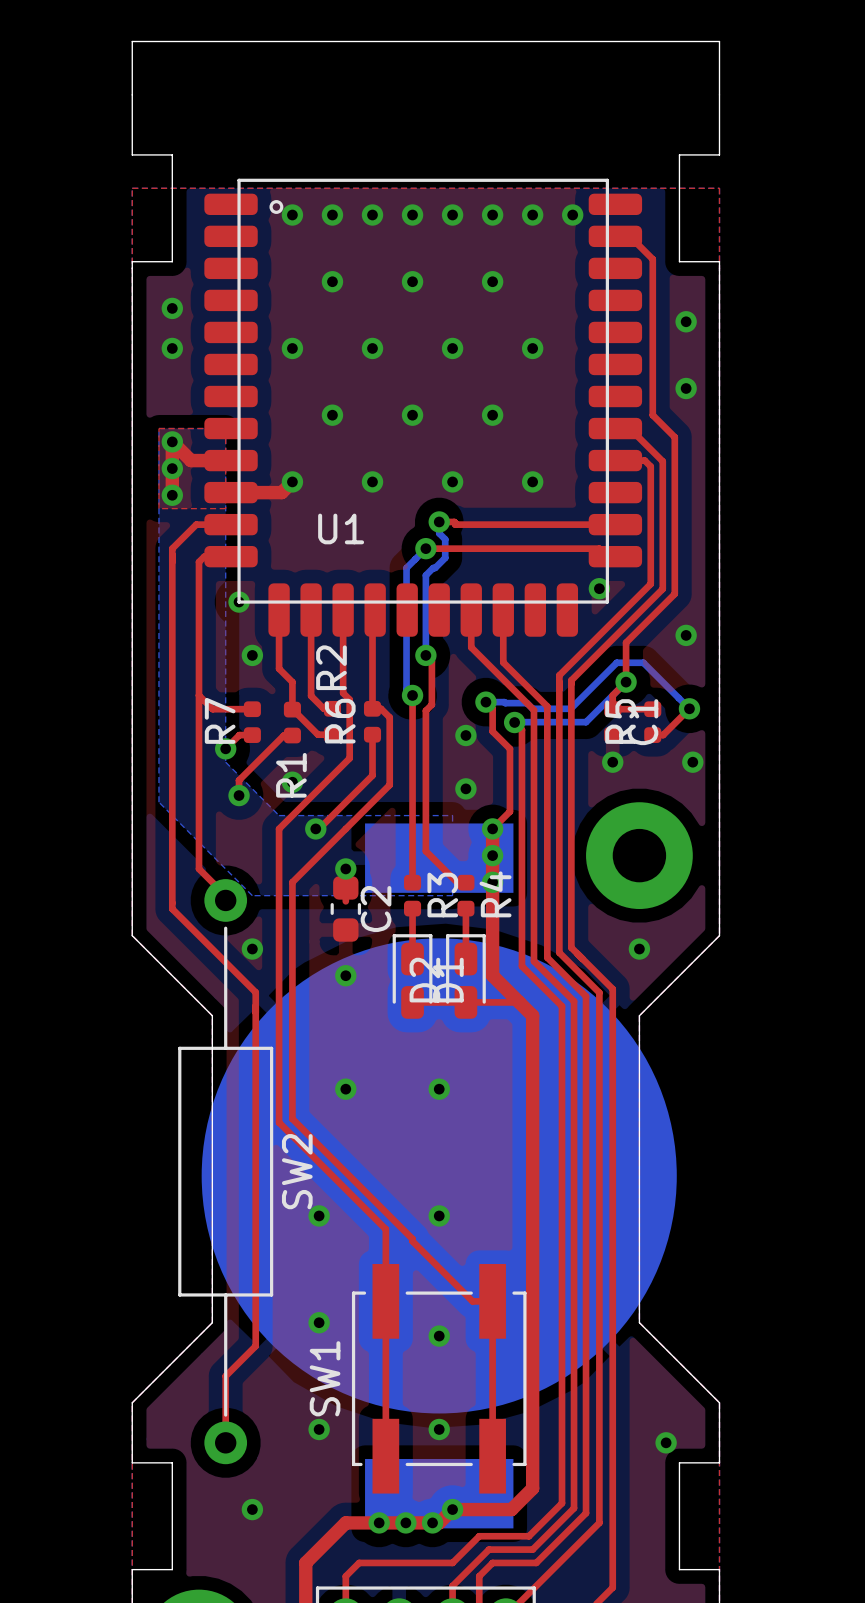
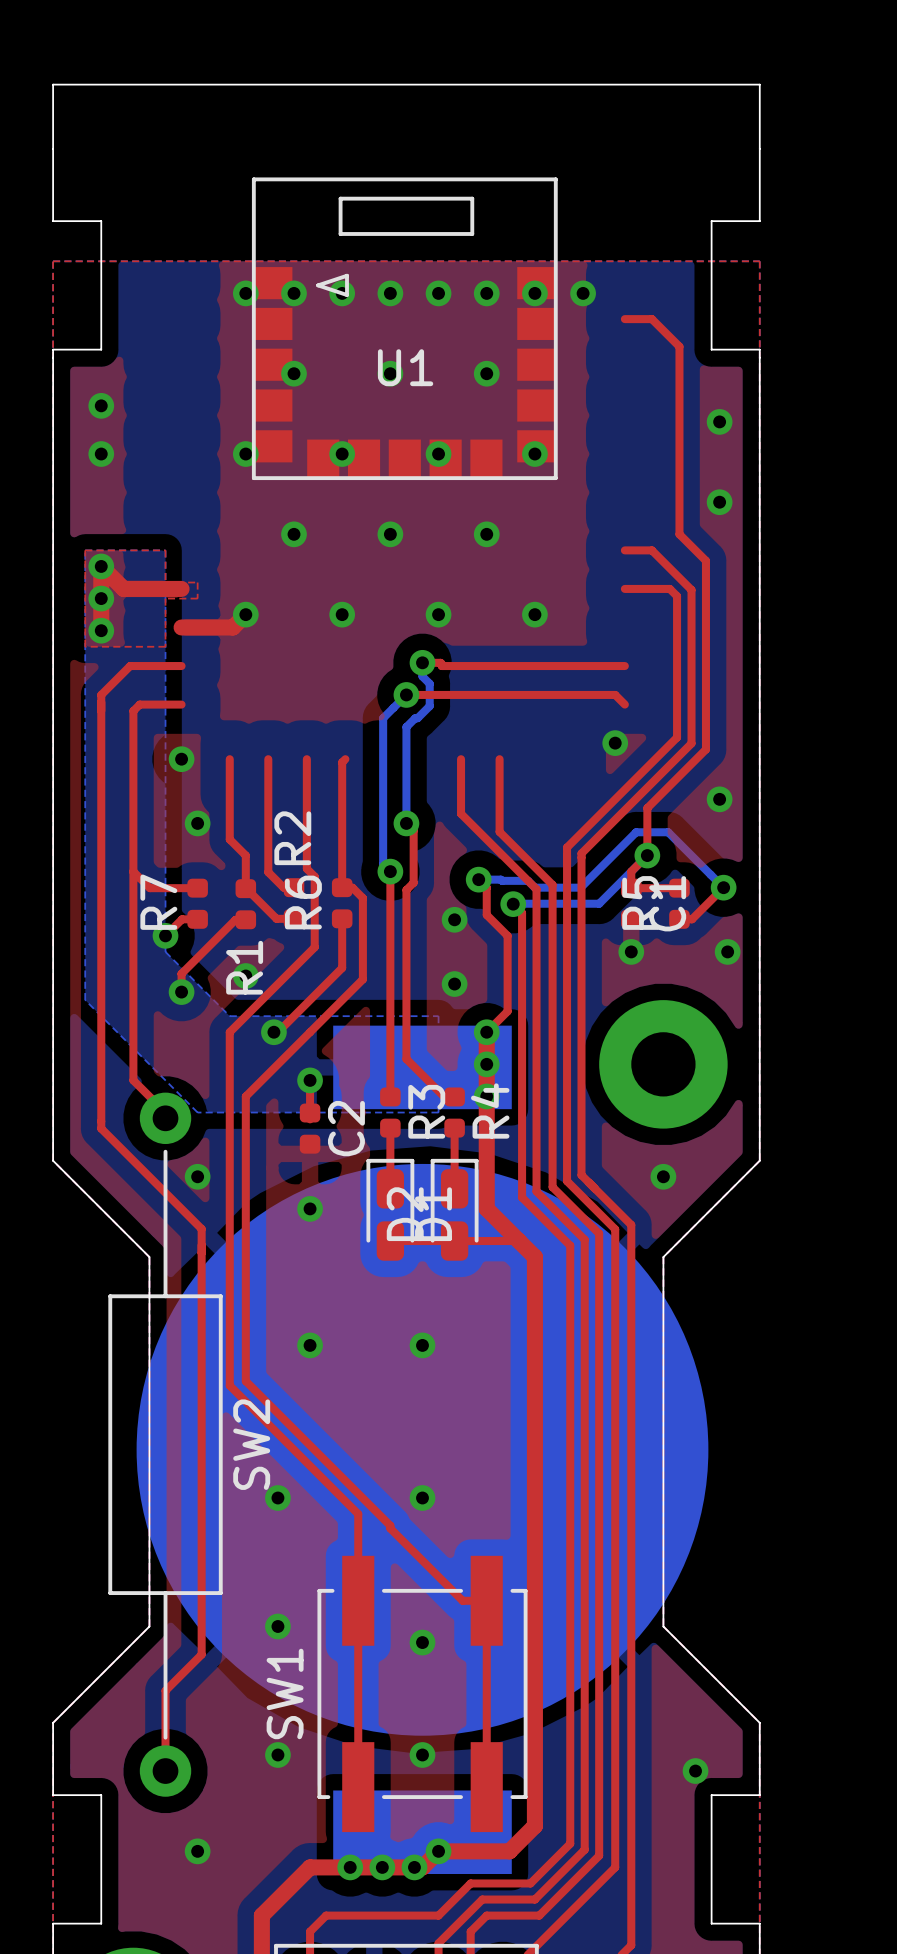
U1 footprint: [204, 178, 643, 637] -> [251, 177, 558, 481]
U1 name position: U1 (341, 528) -> U1 (405, 367)
C2 footprint: [330, 876, 362, 942] -> [299, 1103, 321, 1154]

